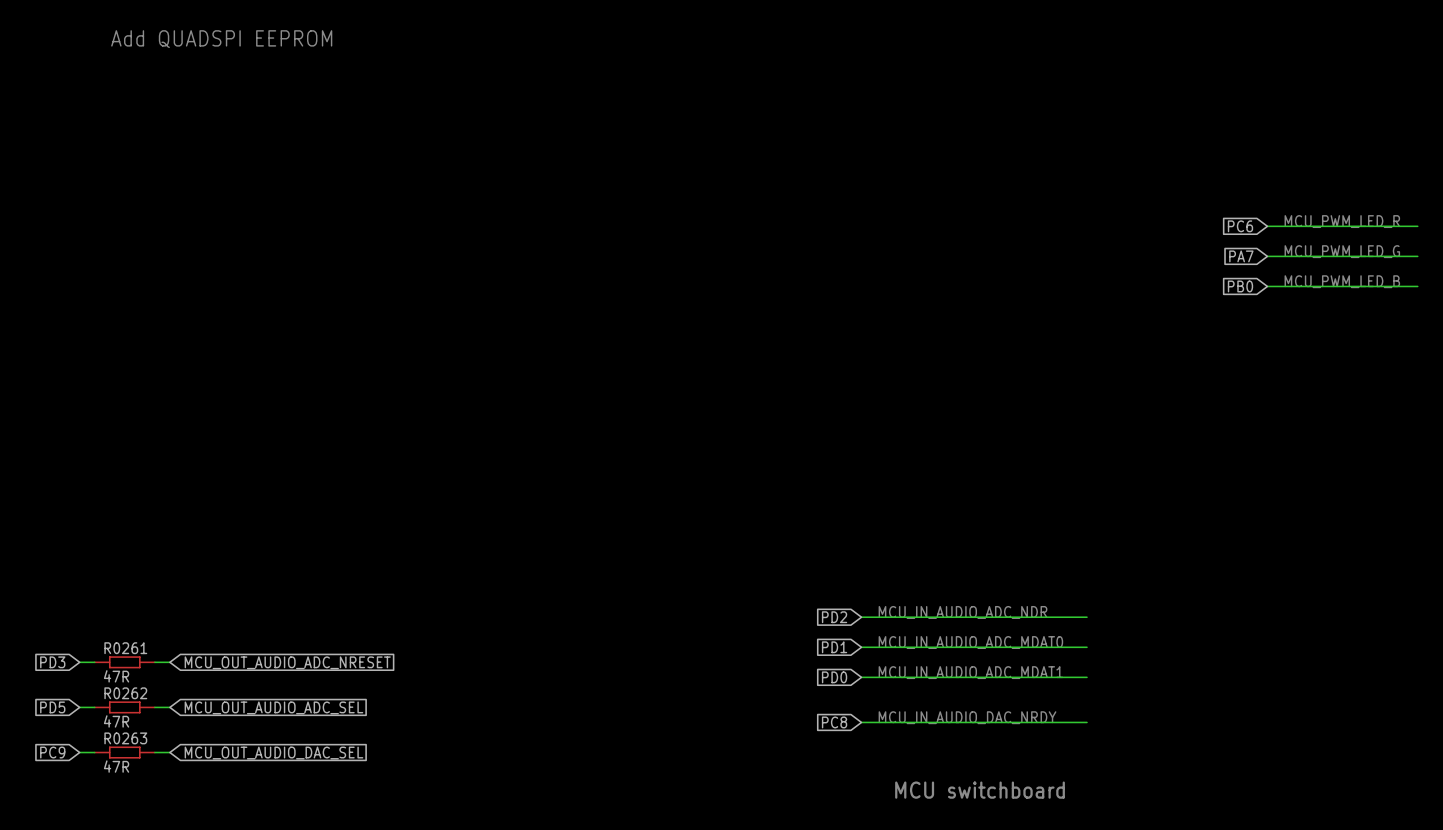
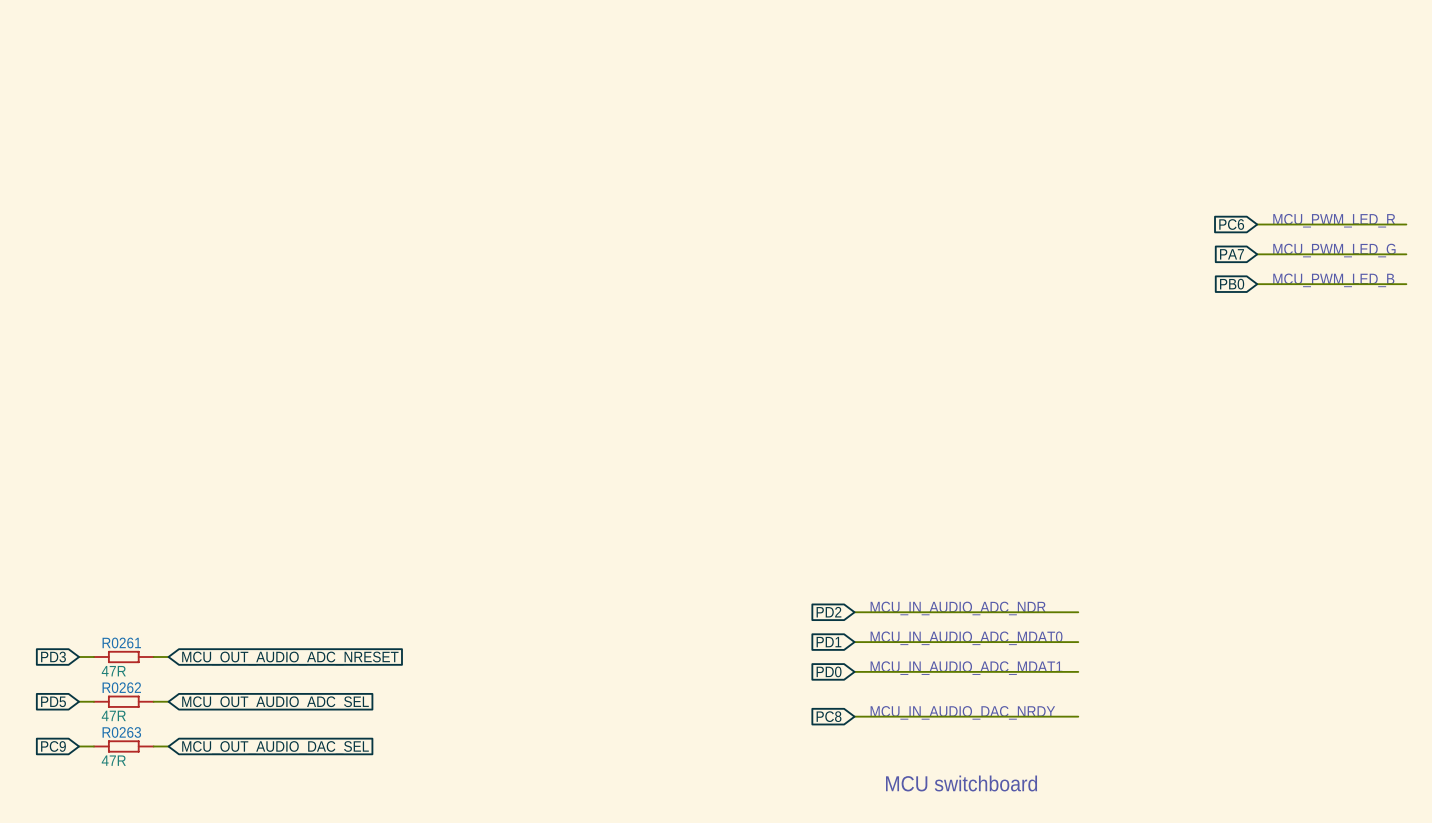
text: Add QUADSPI EEPROM (221, 39) -> none

